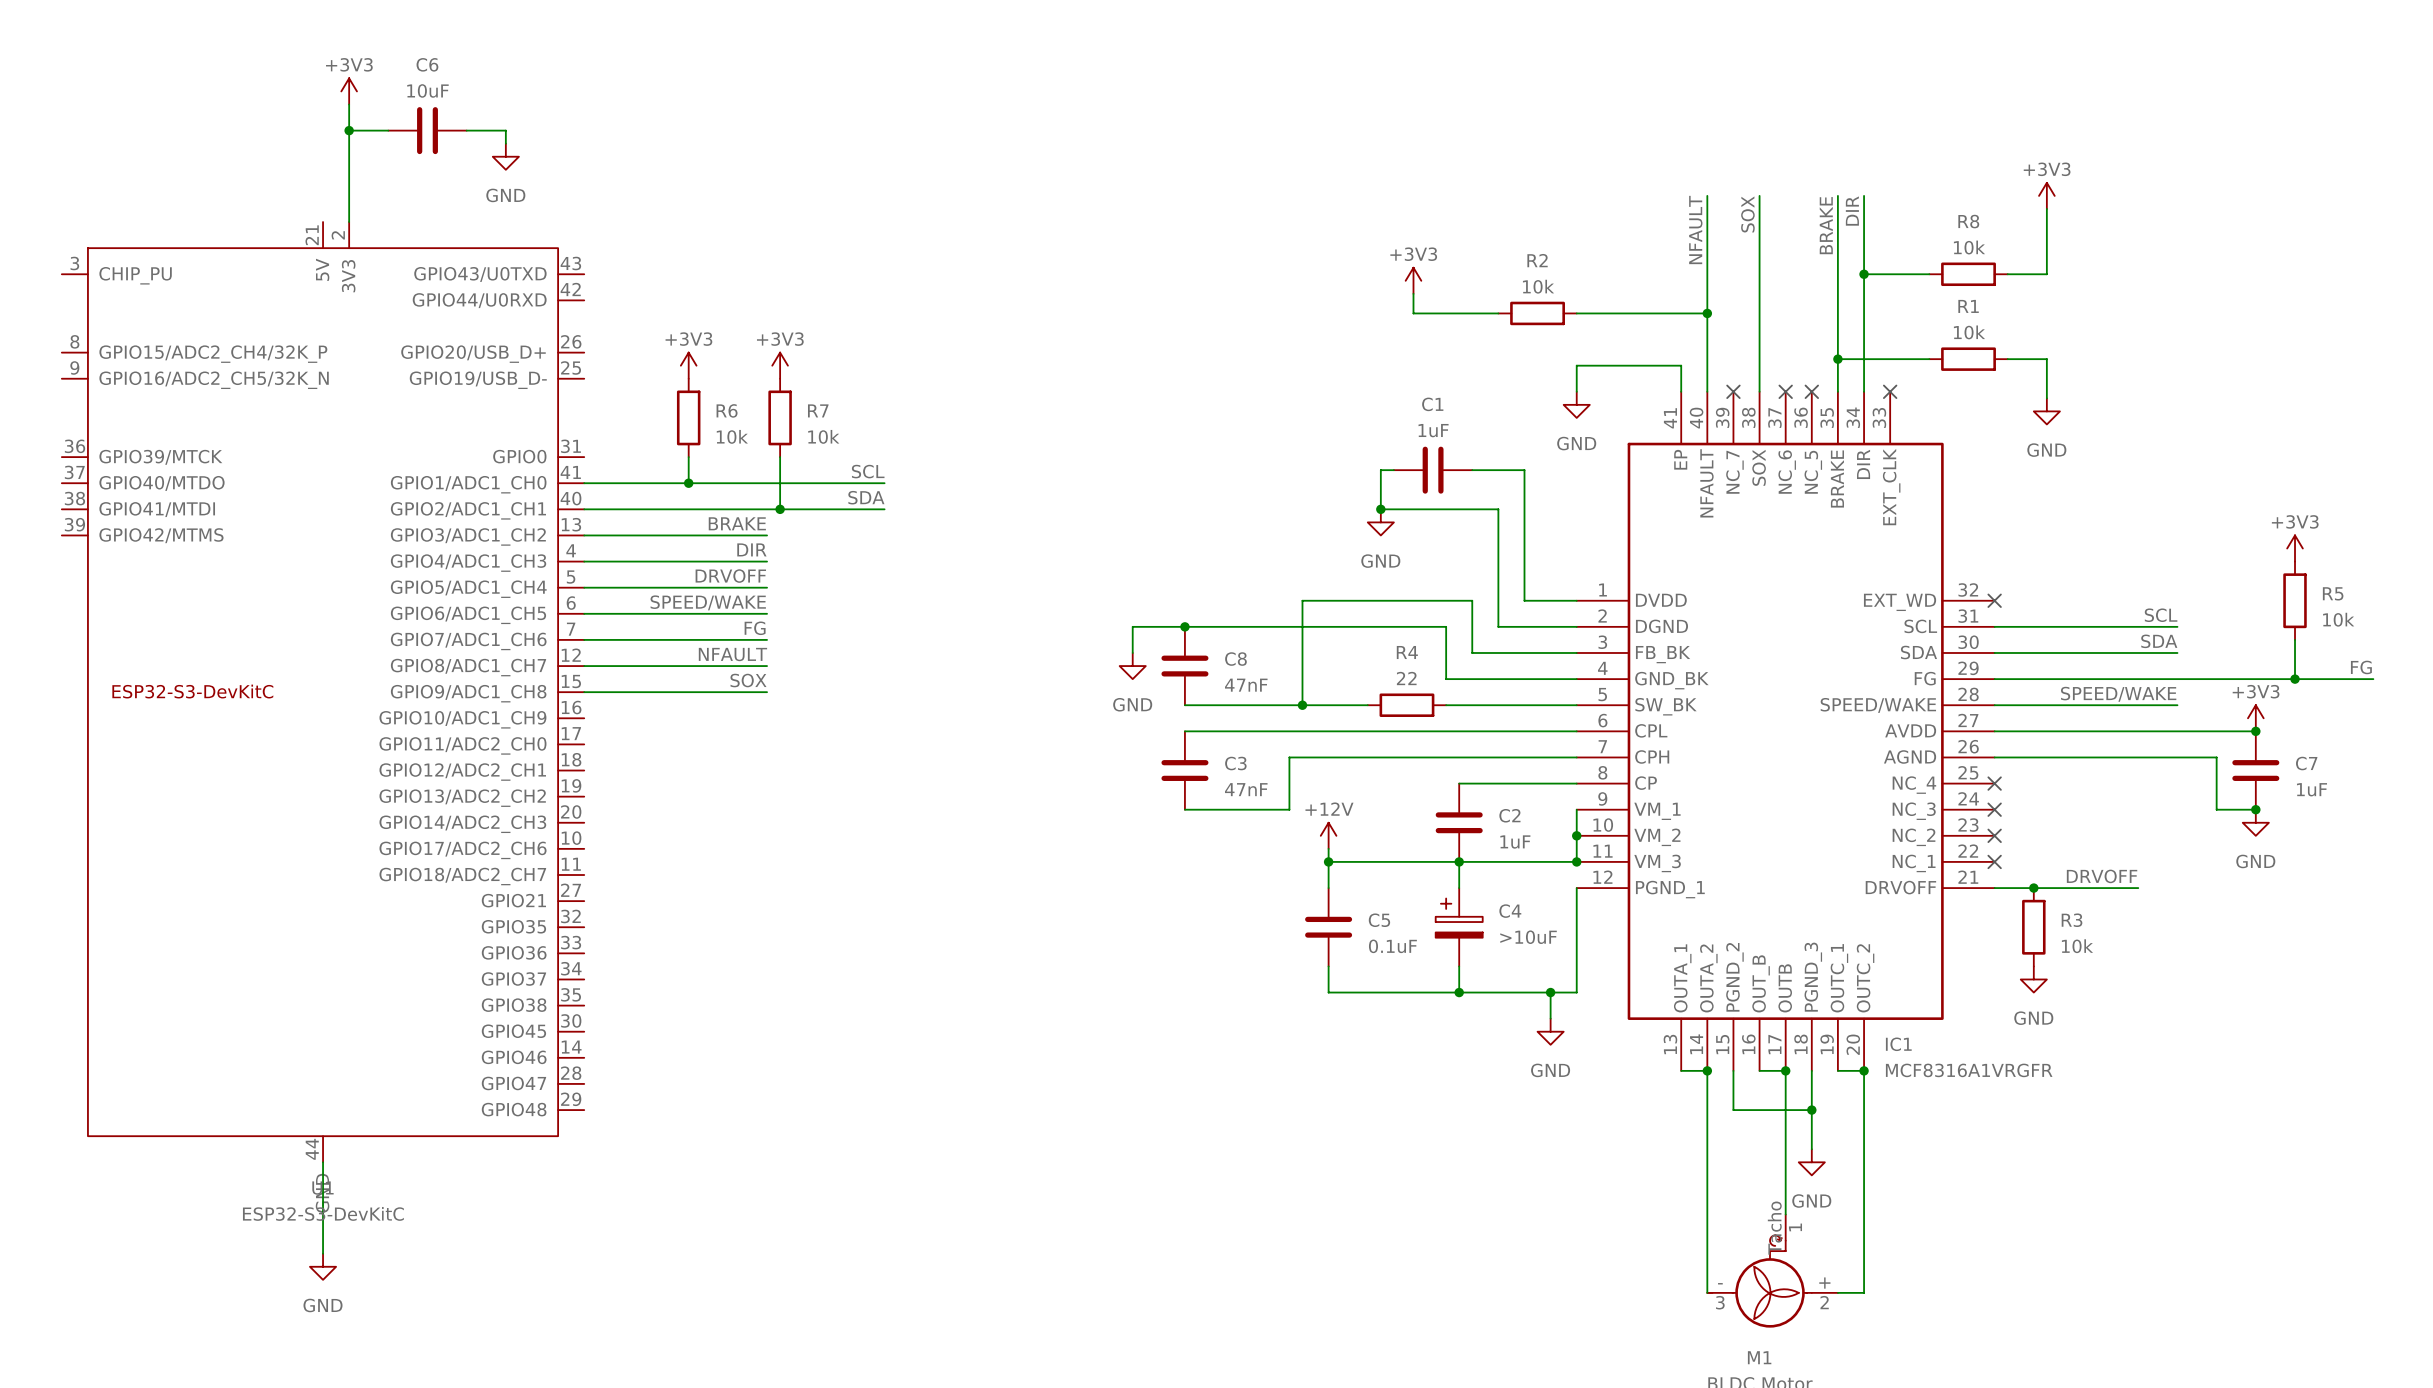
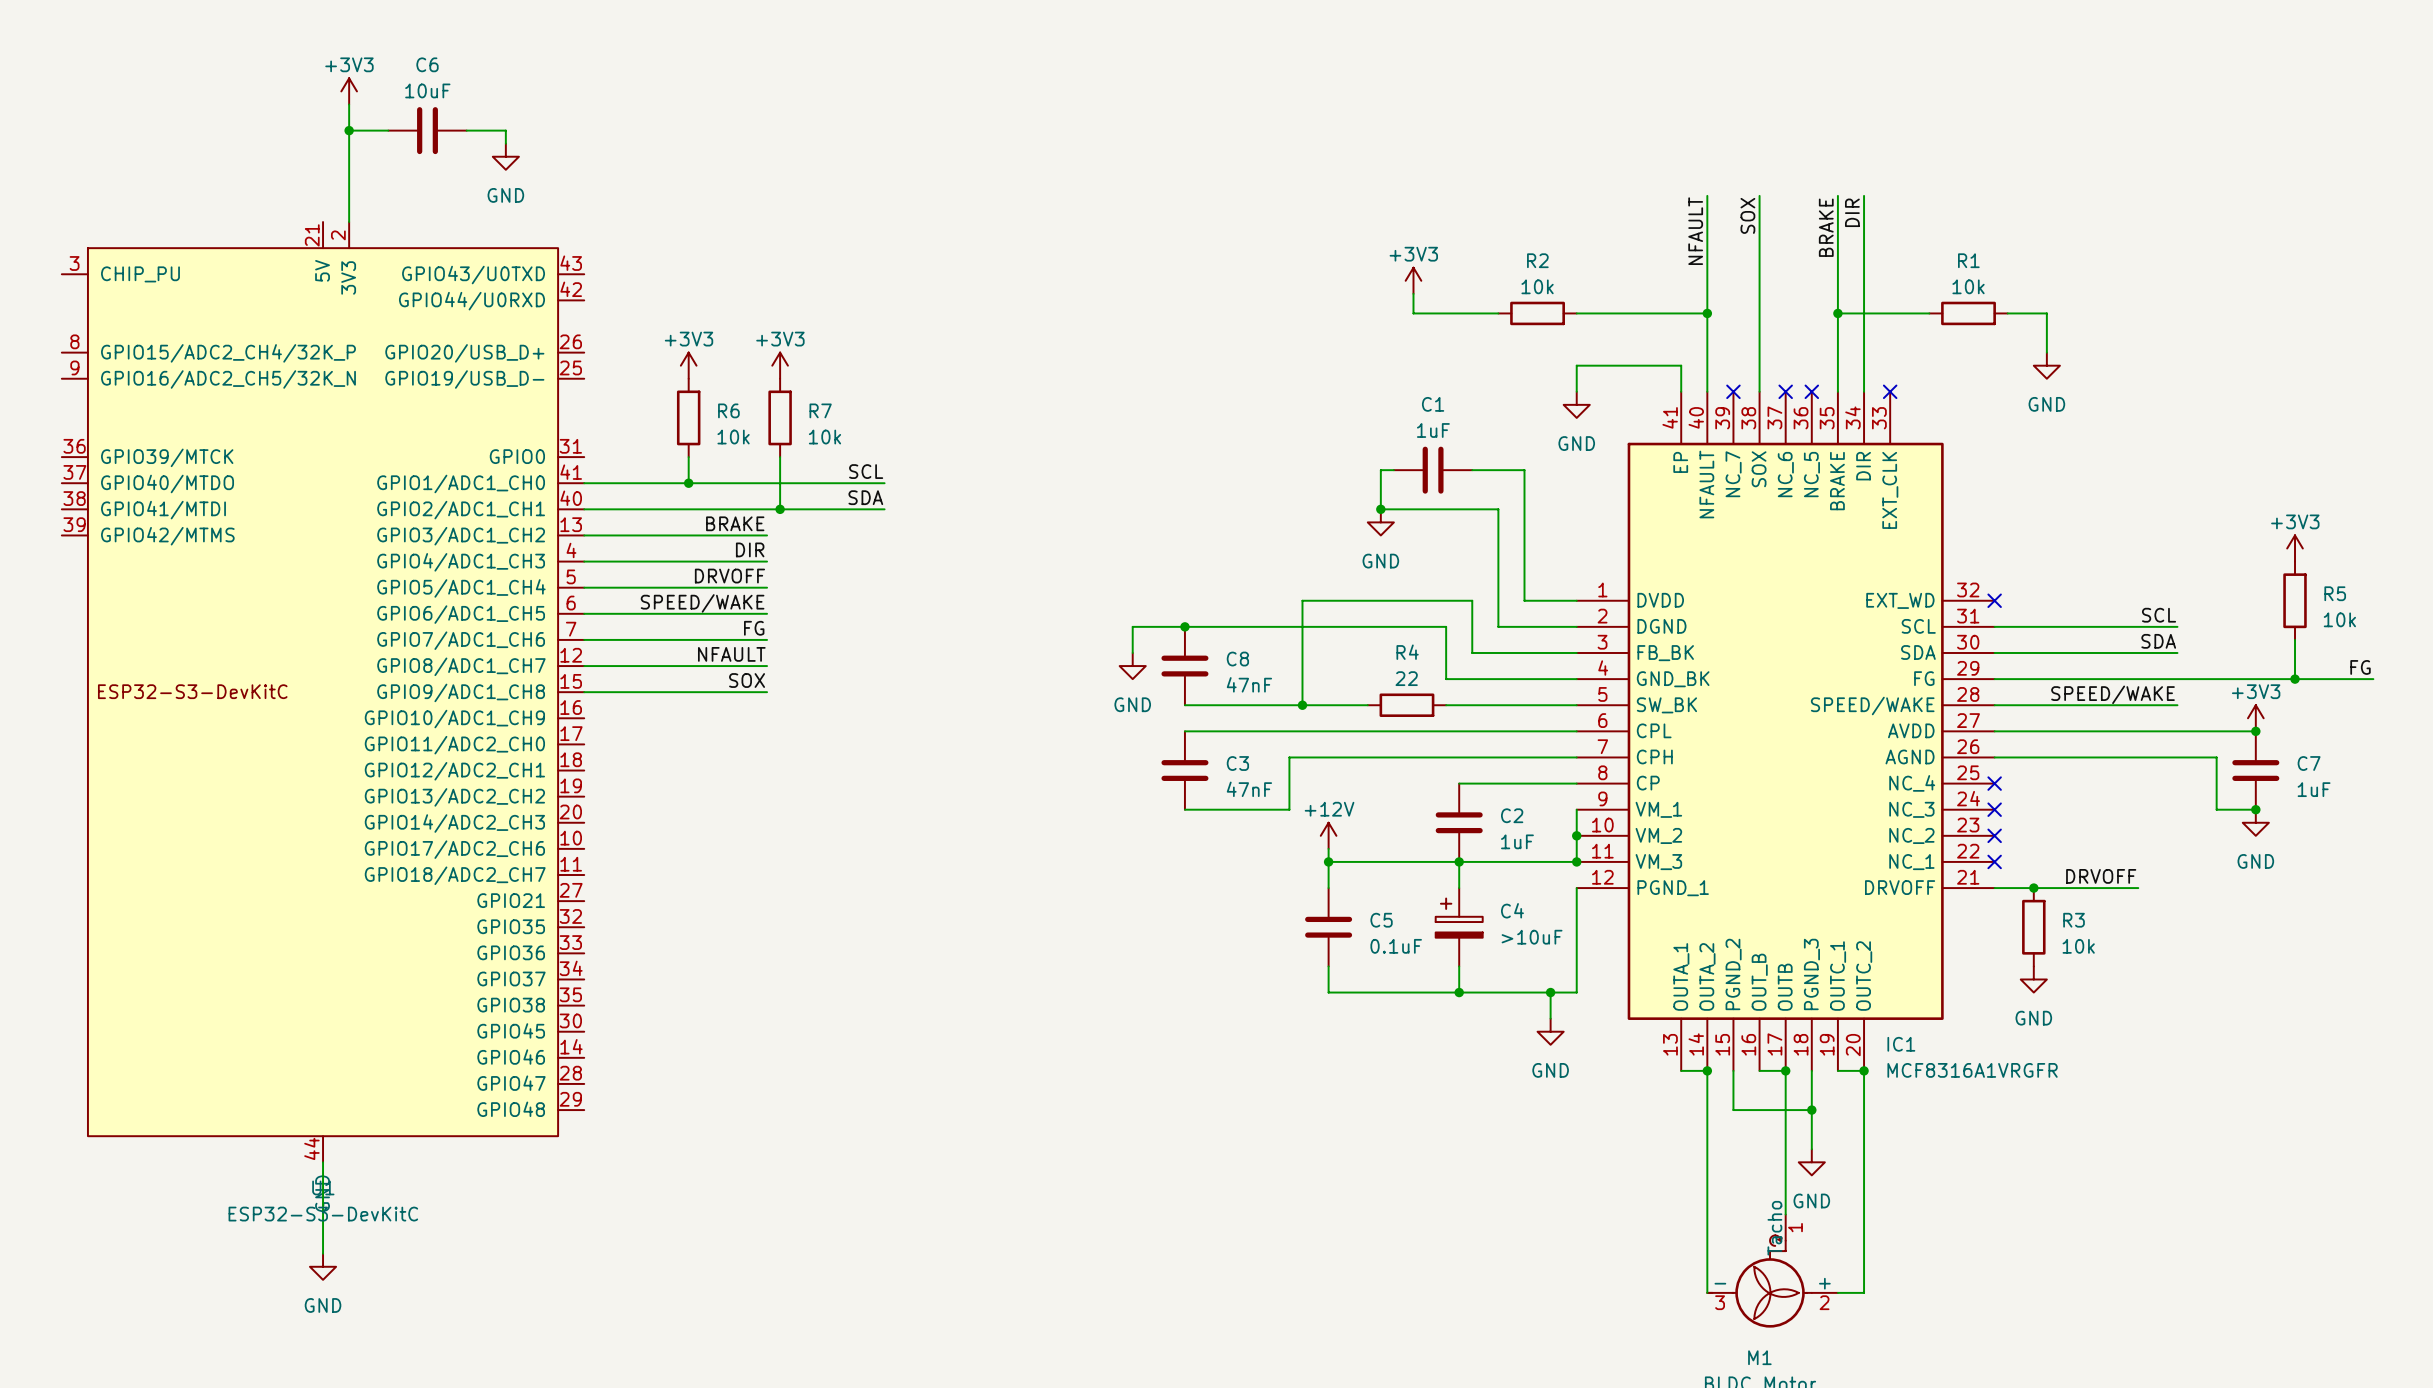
power symbol: +3V3 (2046, 195) -> none
wire: (2046, 208) (2046, 274) (2007, 274) -> none
wire: (1864, 274) (1929, 274) -> none
junction: (1864, 274) -> none
R8: 10k (1968, 274) -> none
junction: none -> (1837, 313)
wire: (1837, 359) (1929, 359) -> (1837, 313) (1929, 313)
junction: (1837, 359) -> none
R1 position: (1968, 359) -> (1968, 313)
wire: (2007, 359) (2046, 359) (2046, 398) -> (2007, 313) (2046, 313) (2046, 352)
power symbol position: GND (2046, 411) -> GND (2046, 365)

